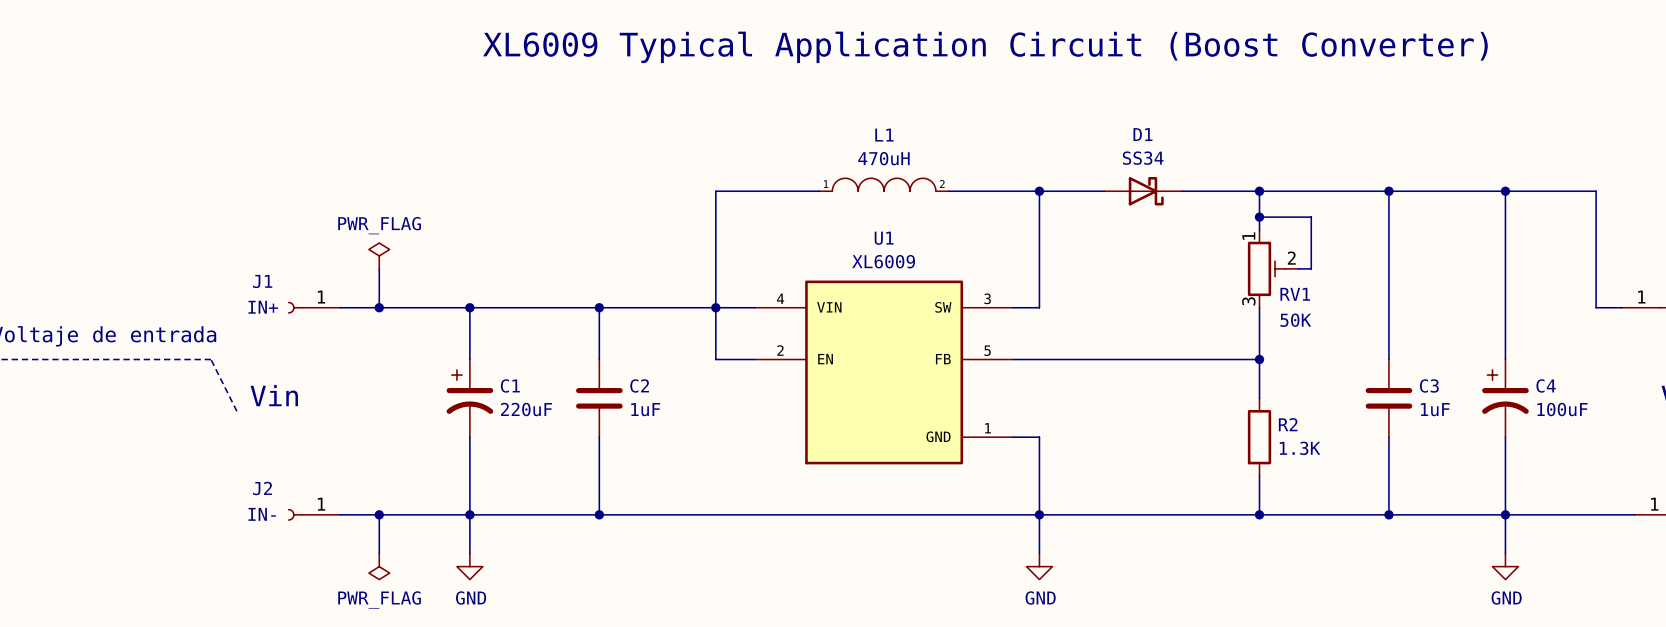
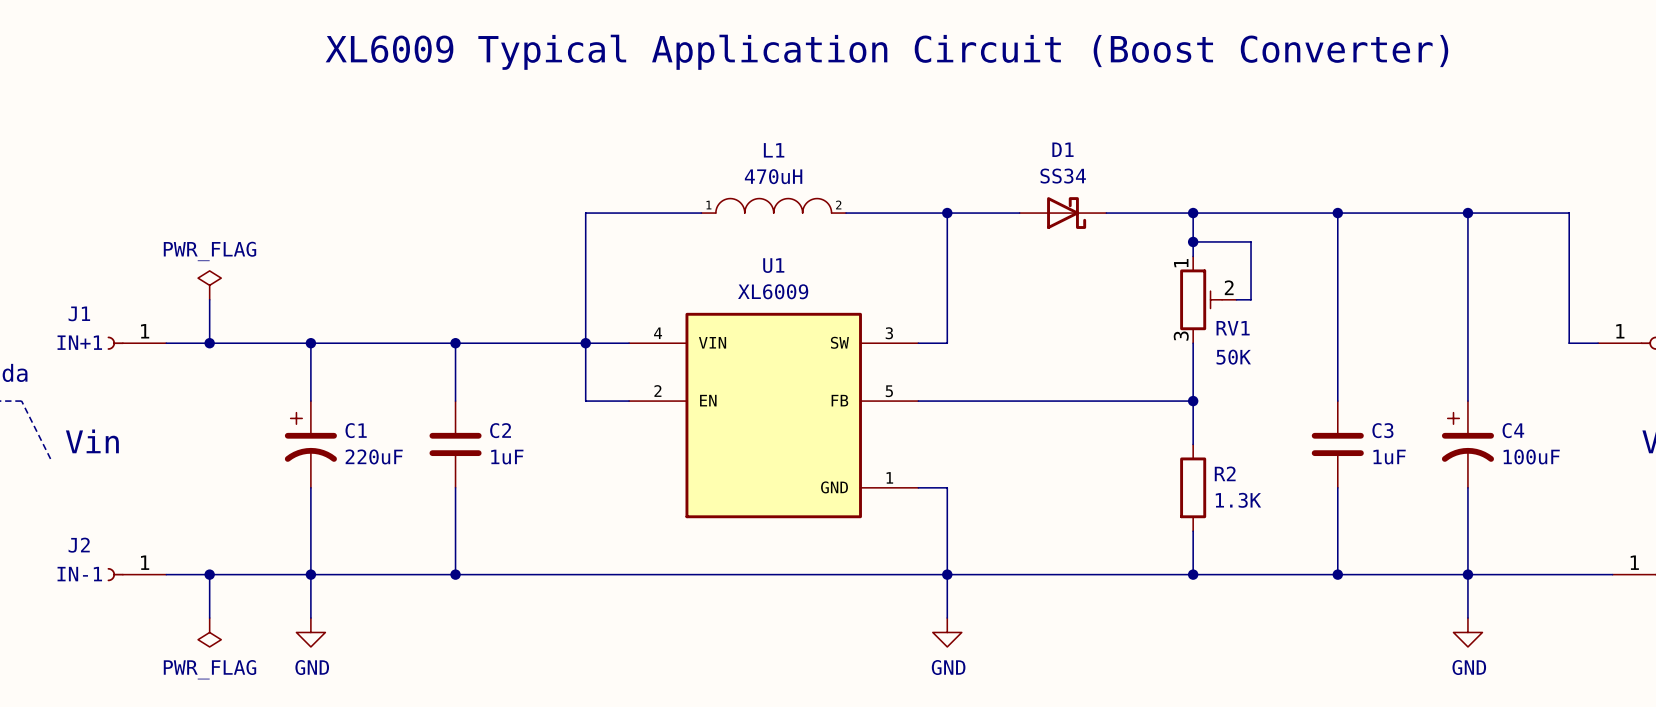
J1 name: J1 (262, 281) -> IN+1 (79, 342)
J1 value: IN+ (263, 307) -> J1 (79, 313)
J2 name: J2 (262, 488) -> IN-1 (79, 574)
J2 value: IN- (262, 514) -> J2 (79, 545)

